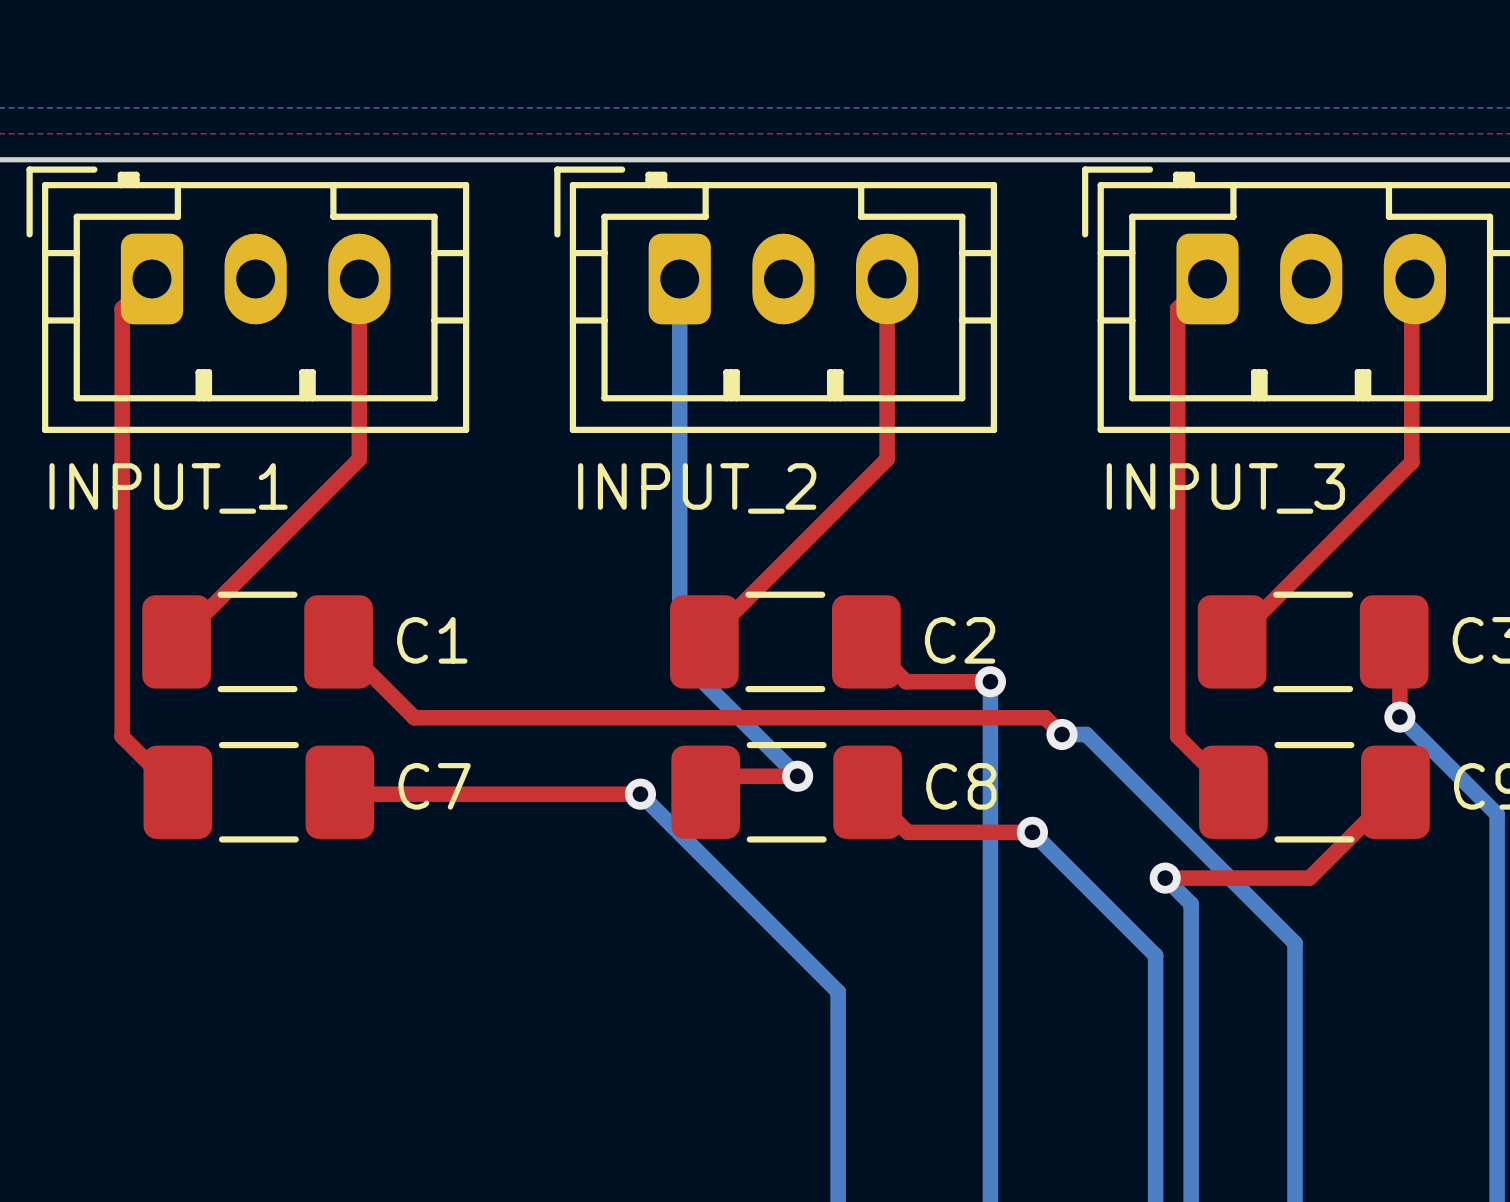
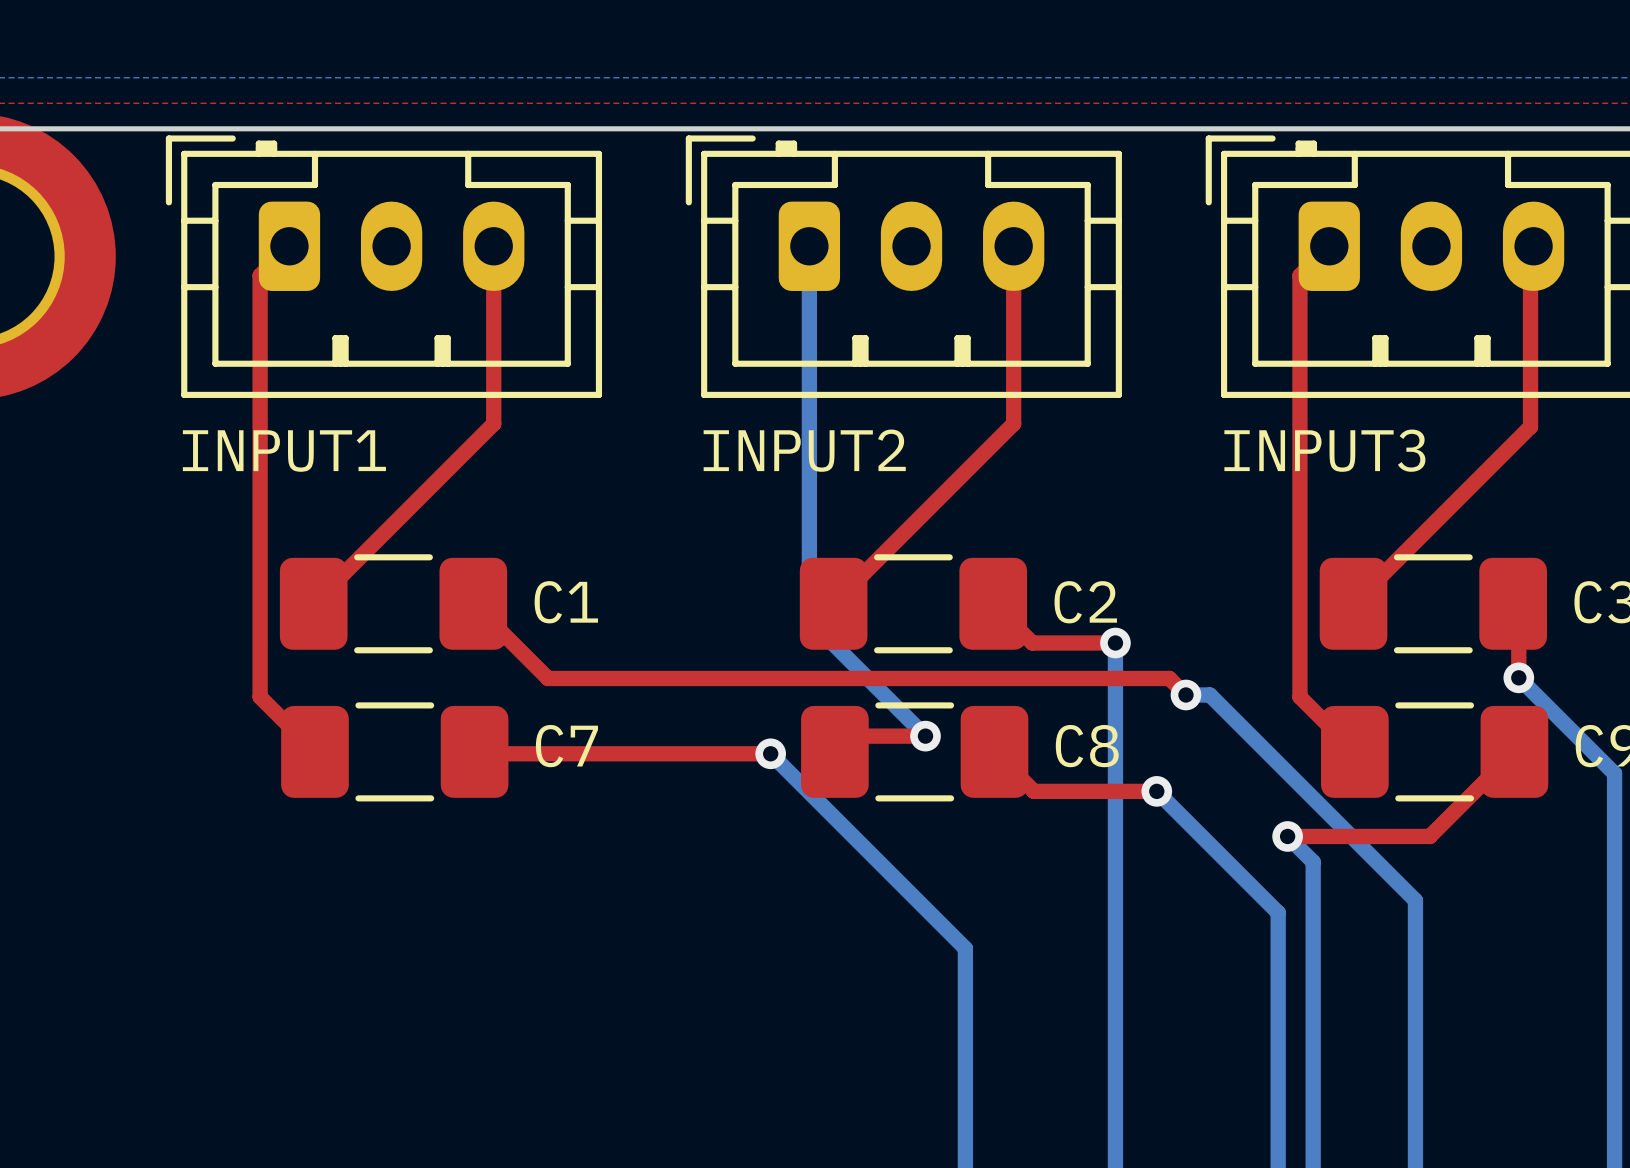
text: INPUT_1 (168, 488) -> INPUT1 (284, 451)
text: INPUT_2 (697, 488) -> INPUT2 (804, 450)
text: INPUT_3 (1225, 488) -> INPUT3 (1324, 450)

